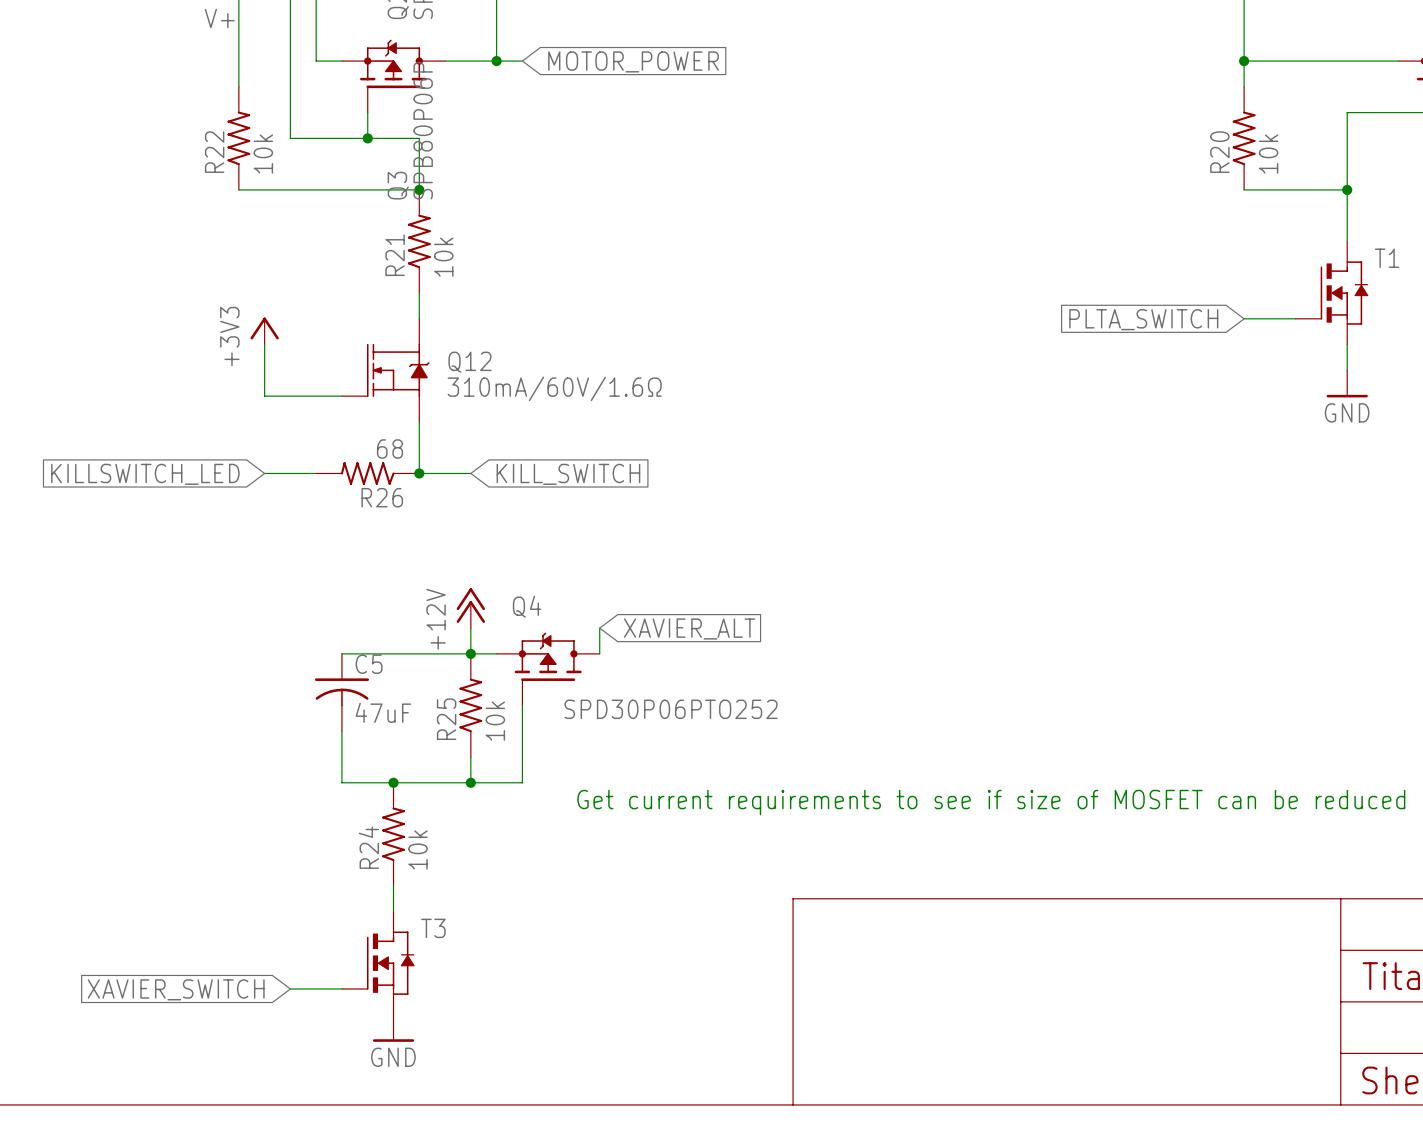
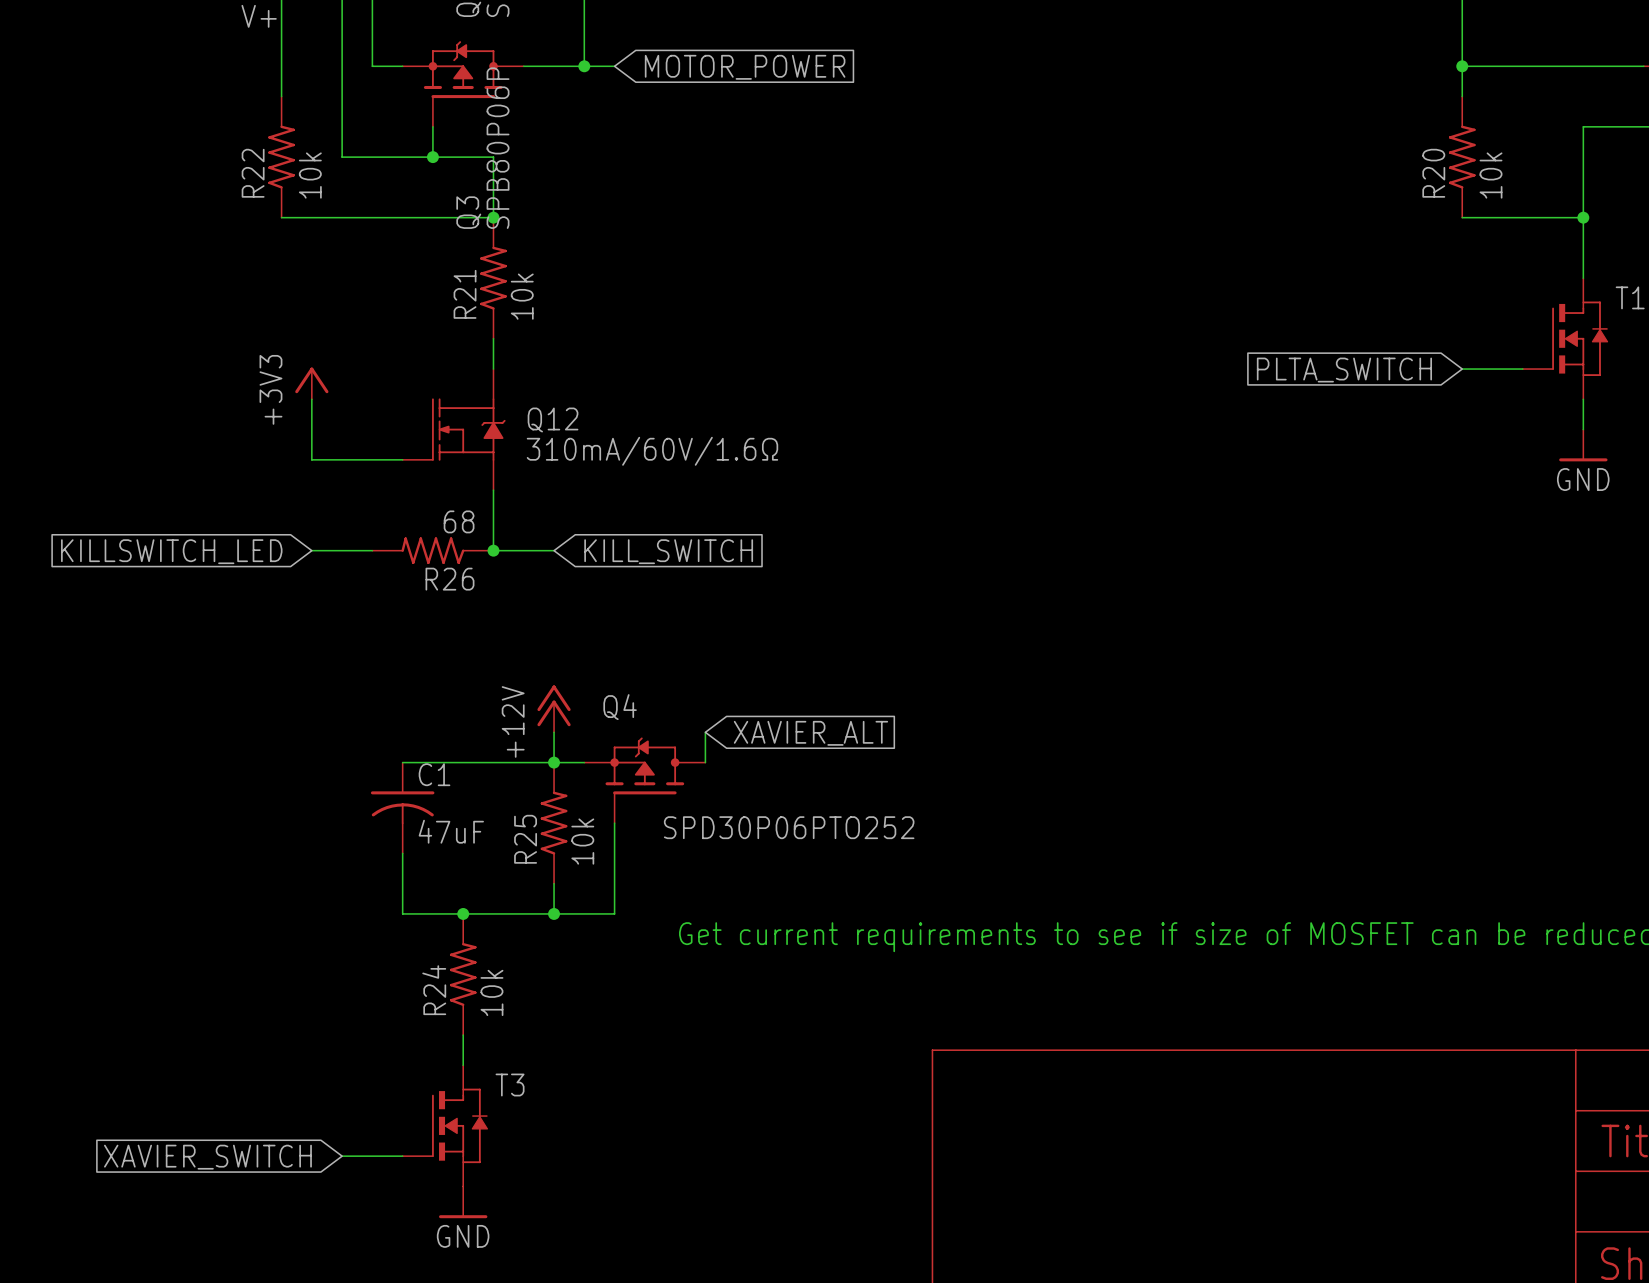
C5 name: C5 (369, 664) -> C1 (434, 774)

